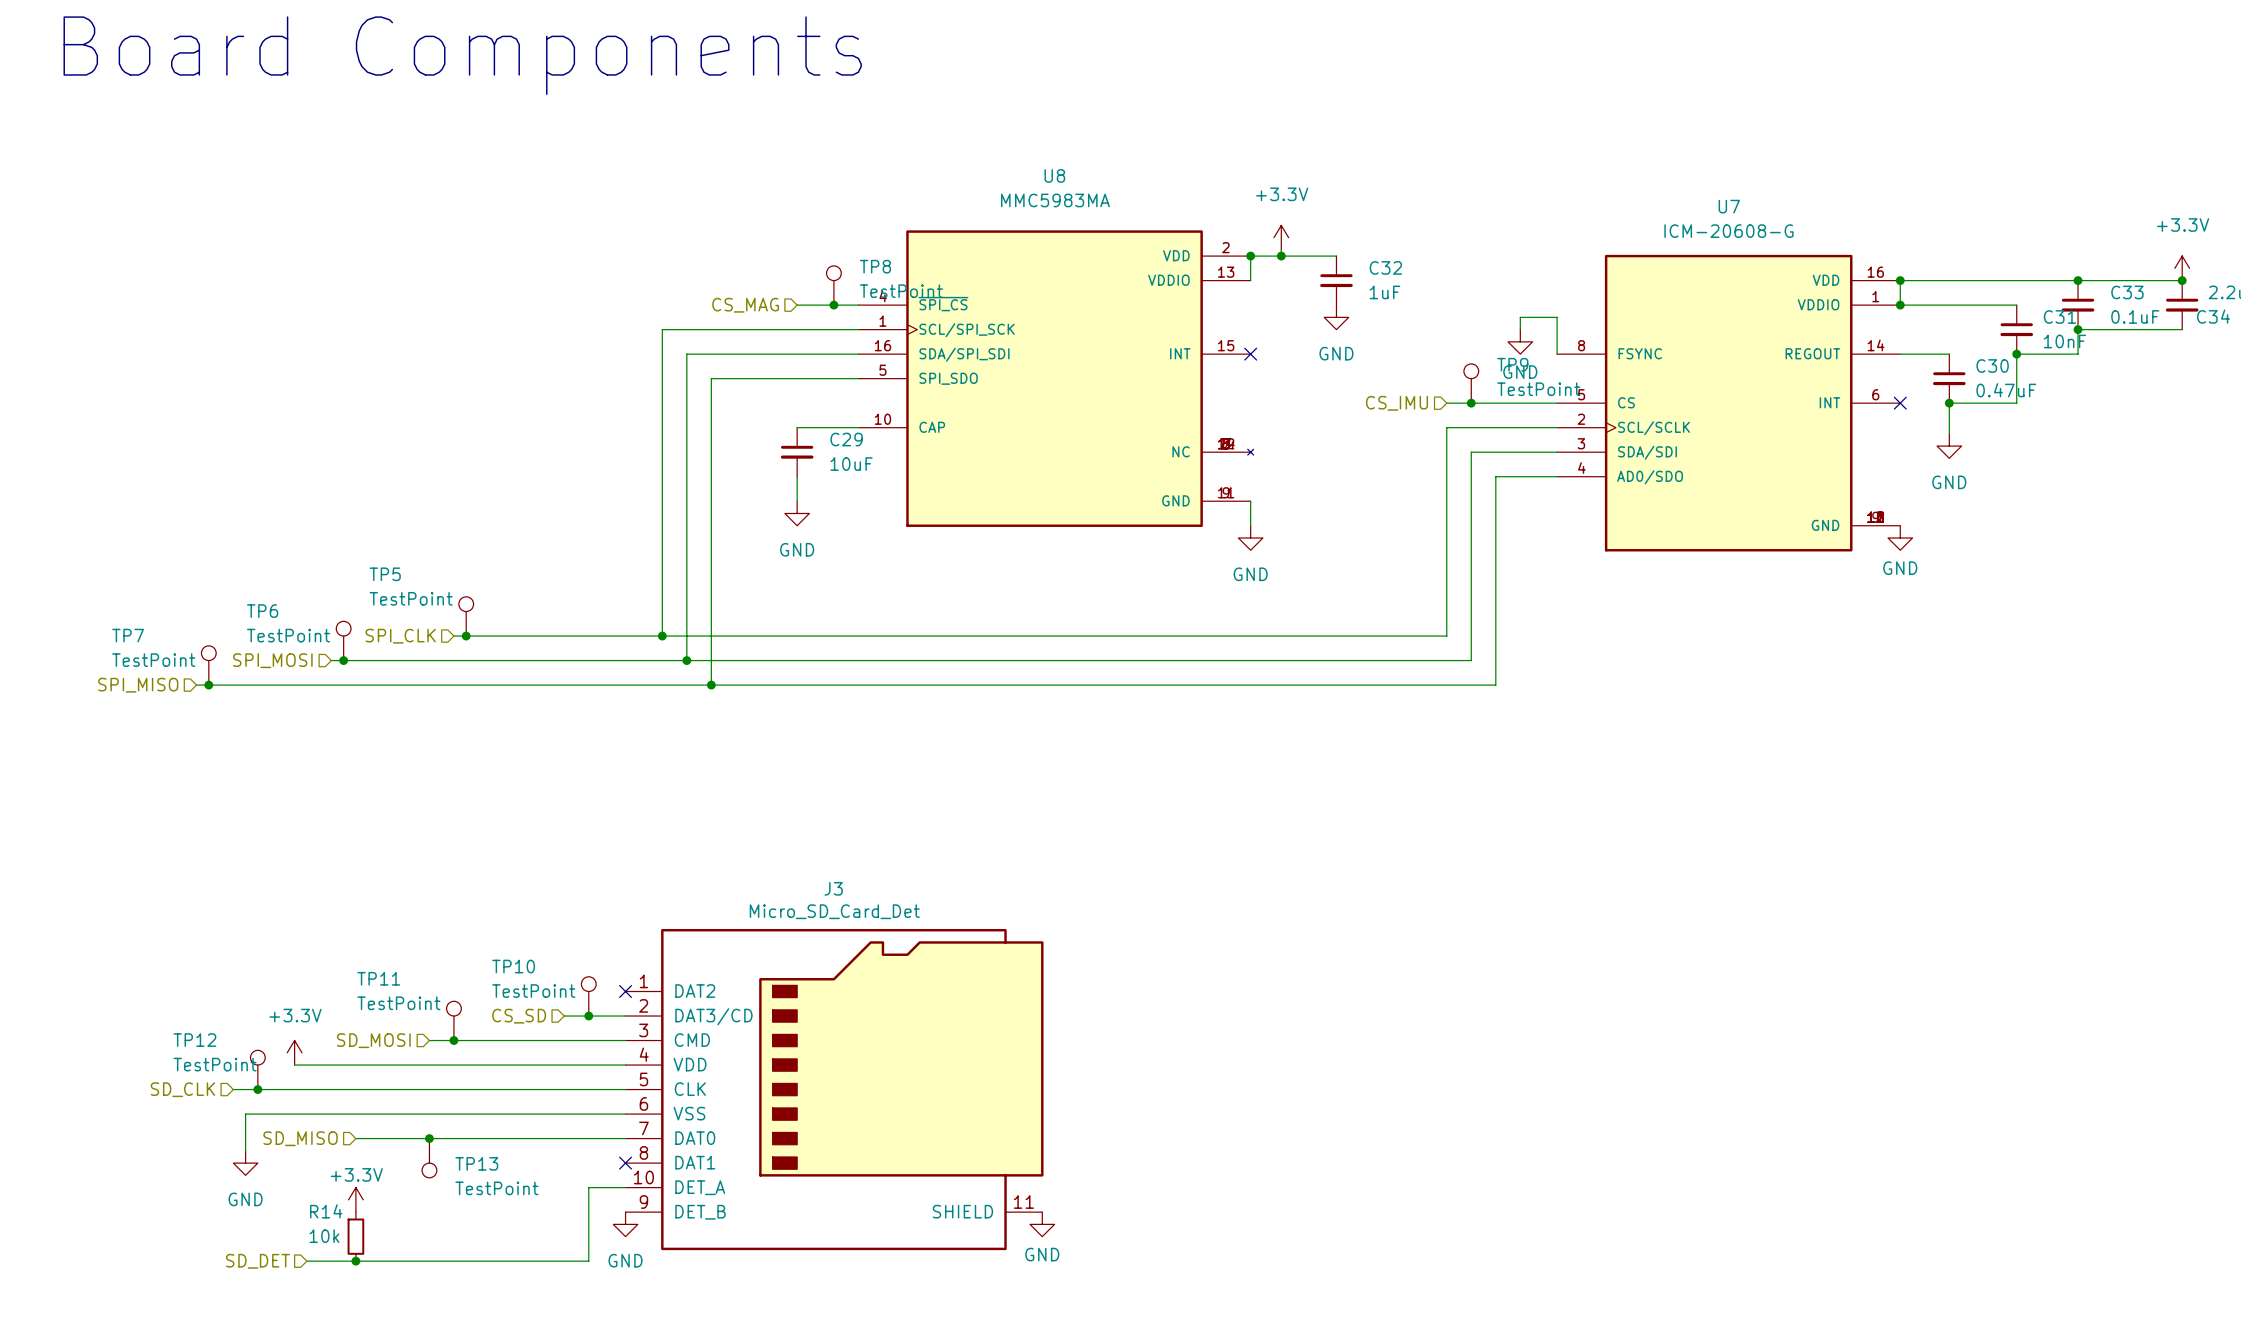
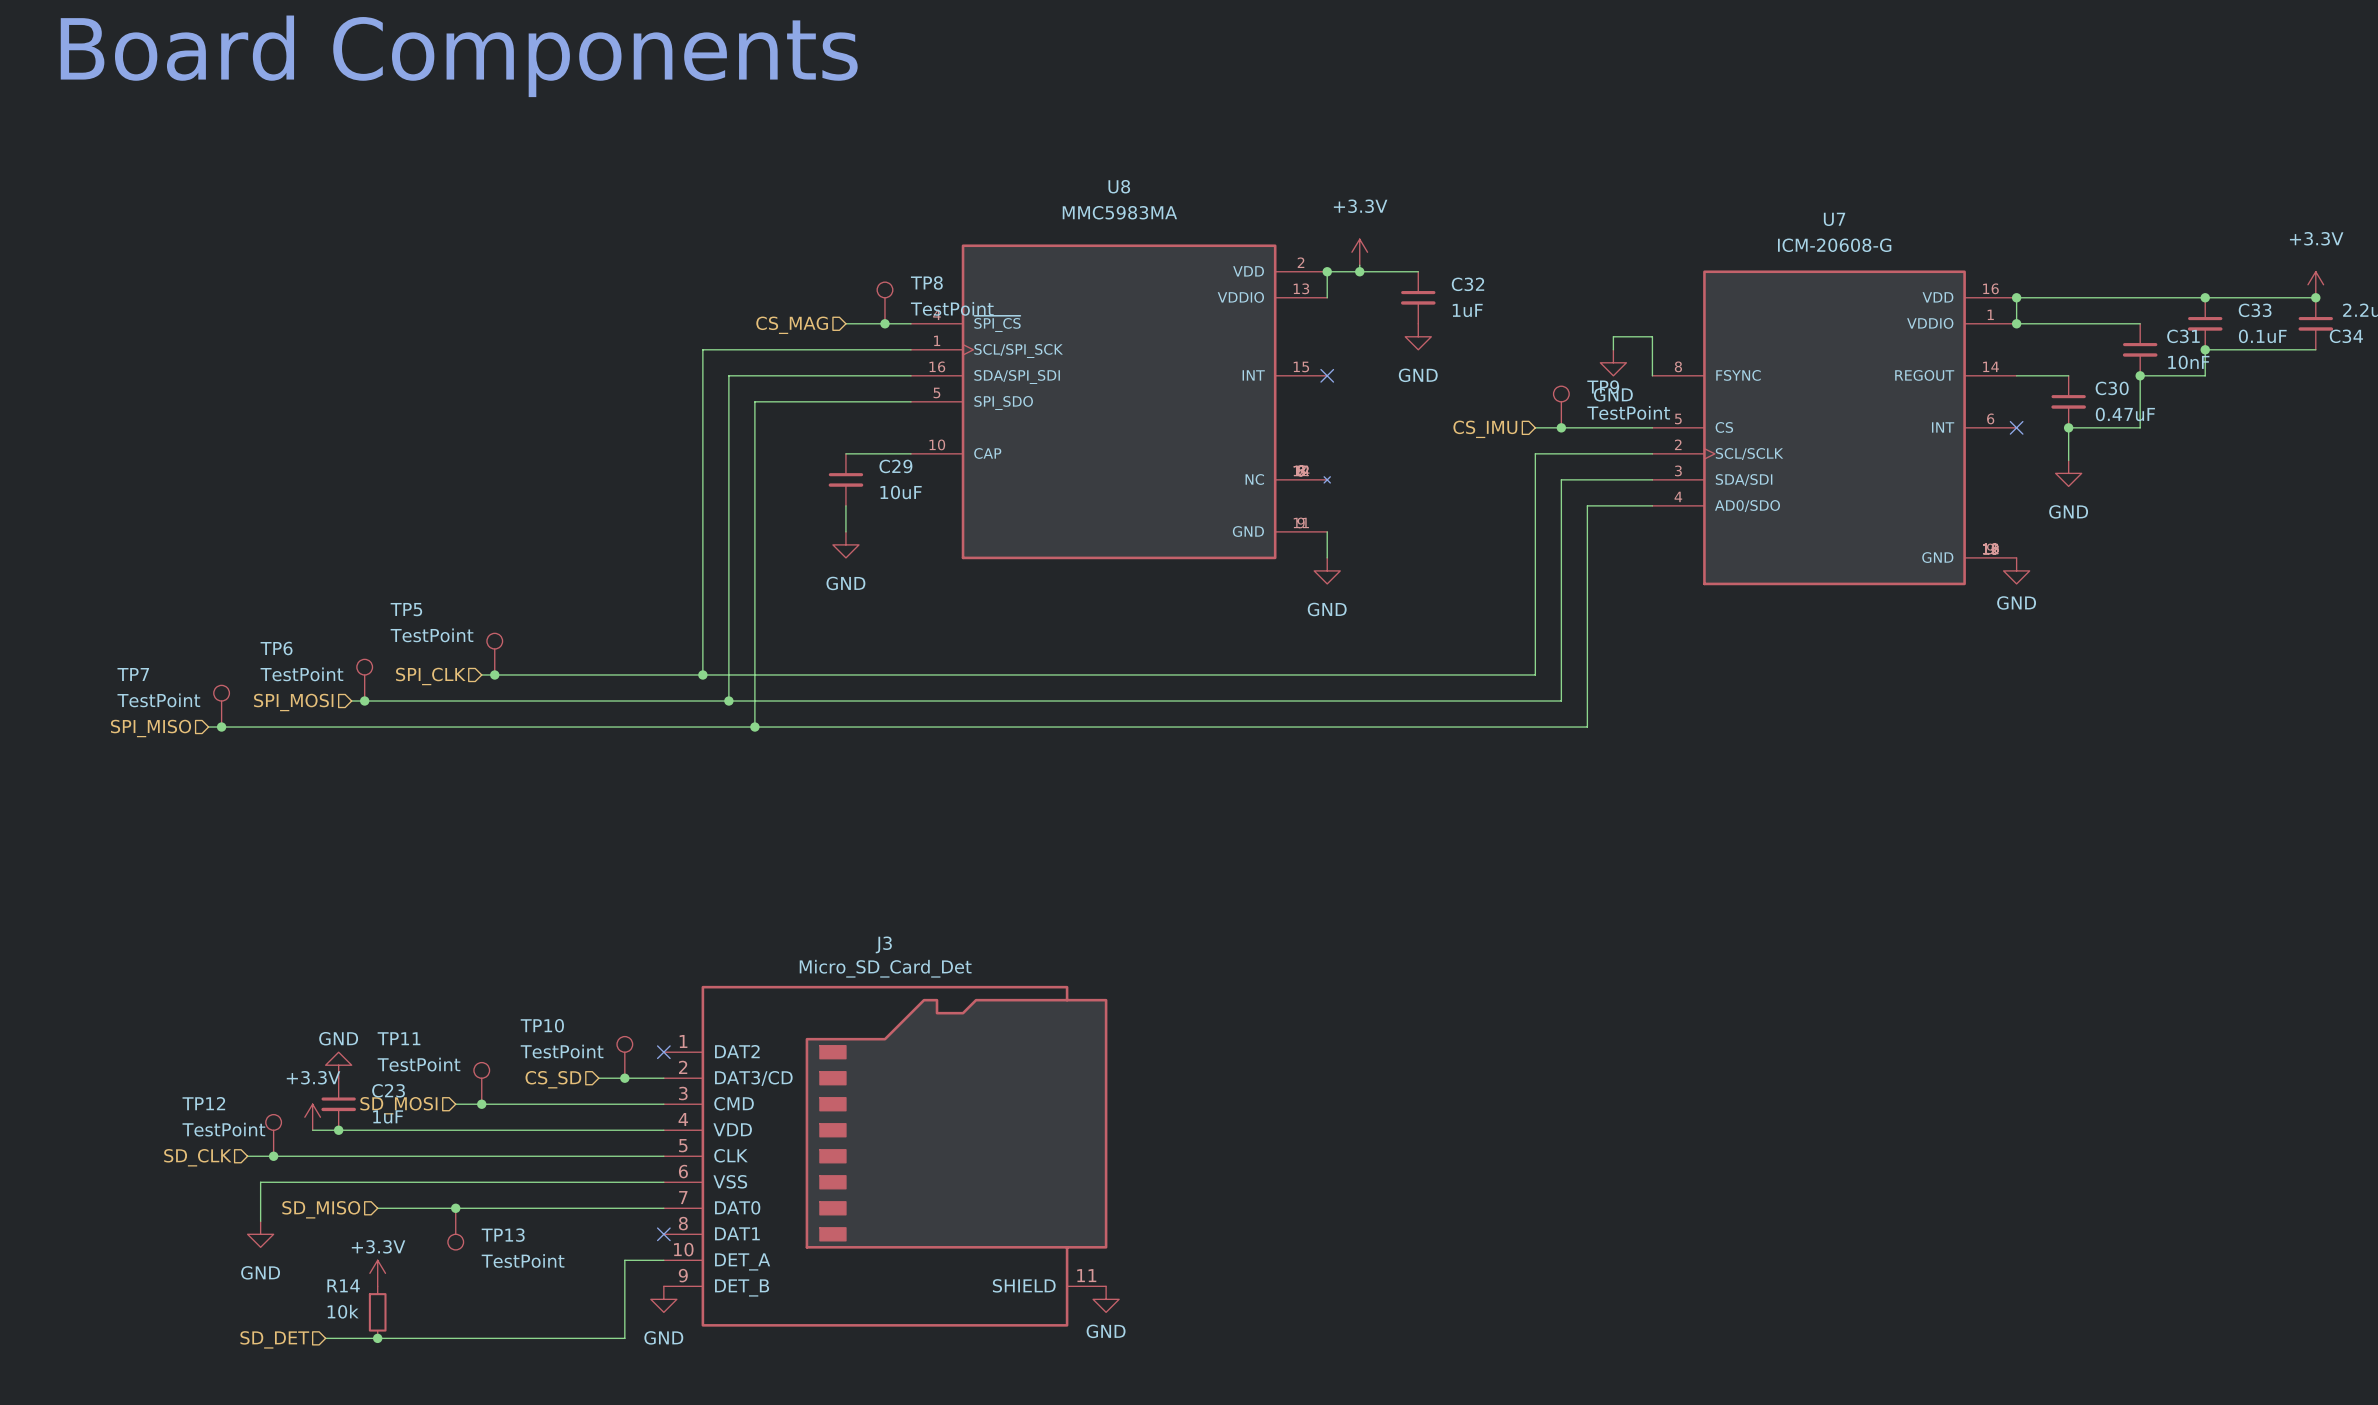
power symbol: none -> GND (338, 1065)
C23: none -> 1uF (338, 1104)
junction: none -> (338, 1130)

